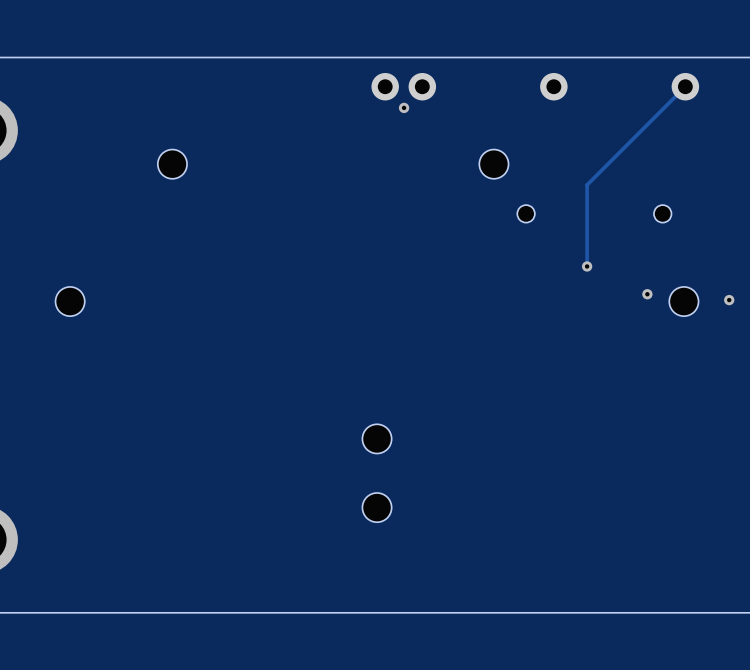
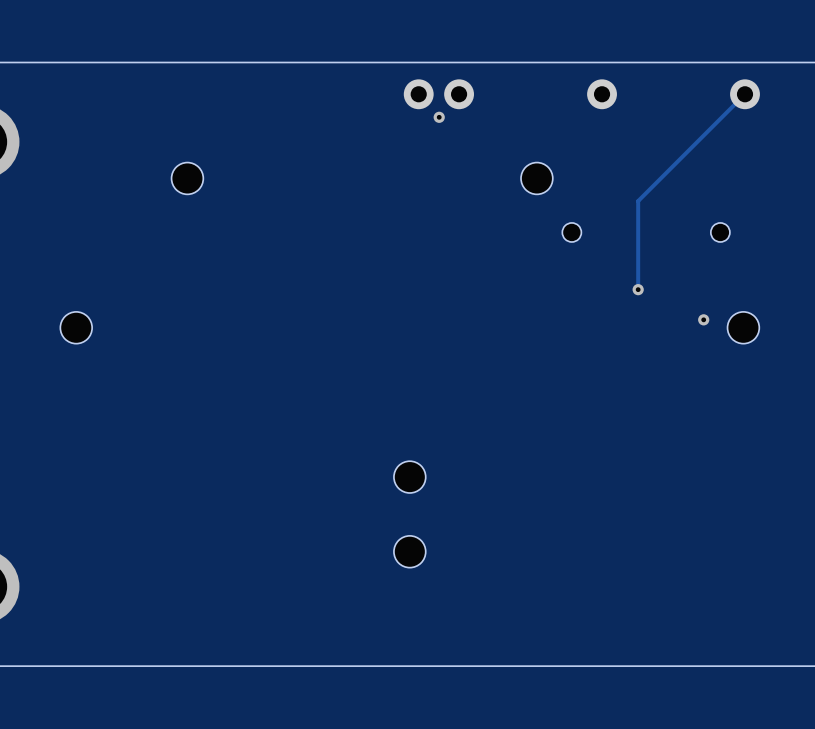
via: (729, 300) -> none

